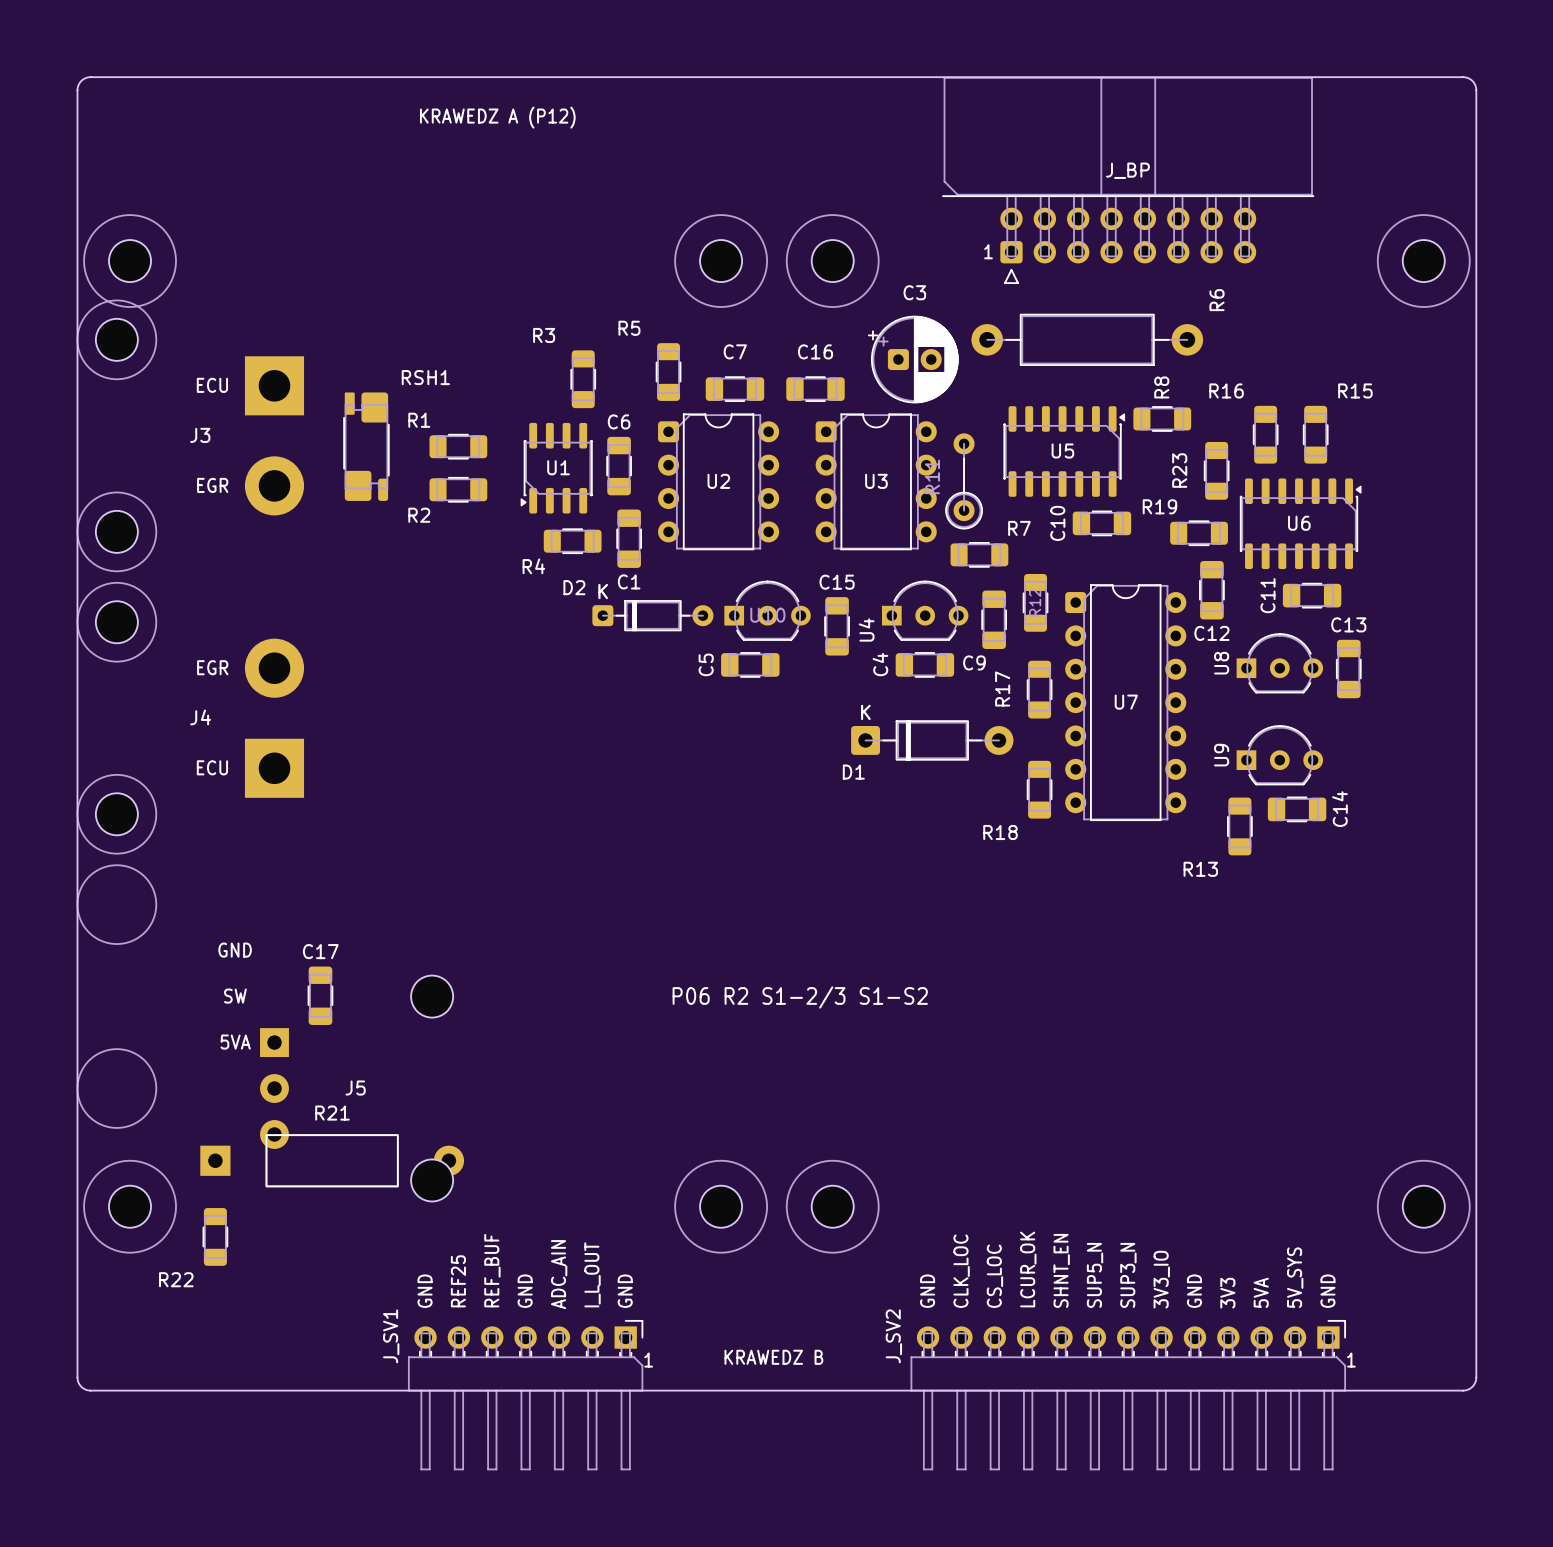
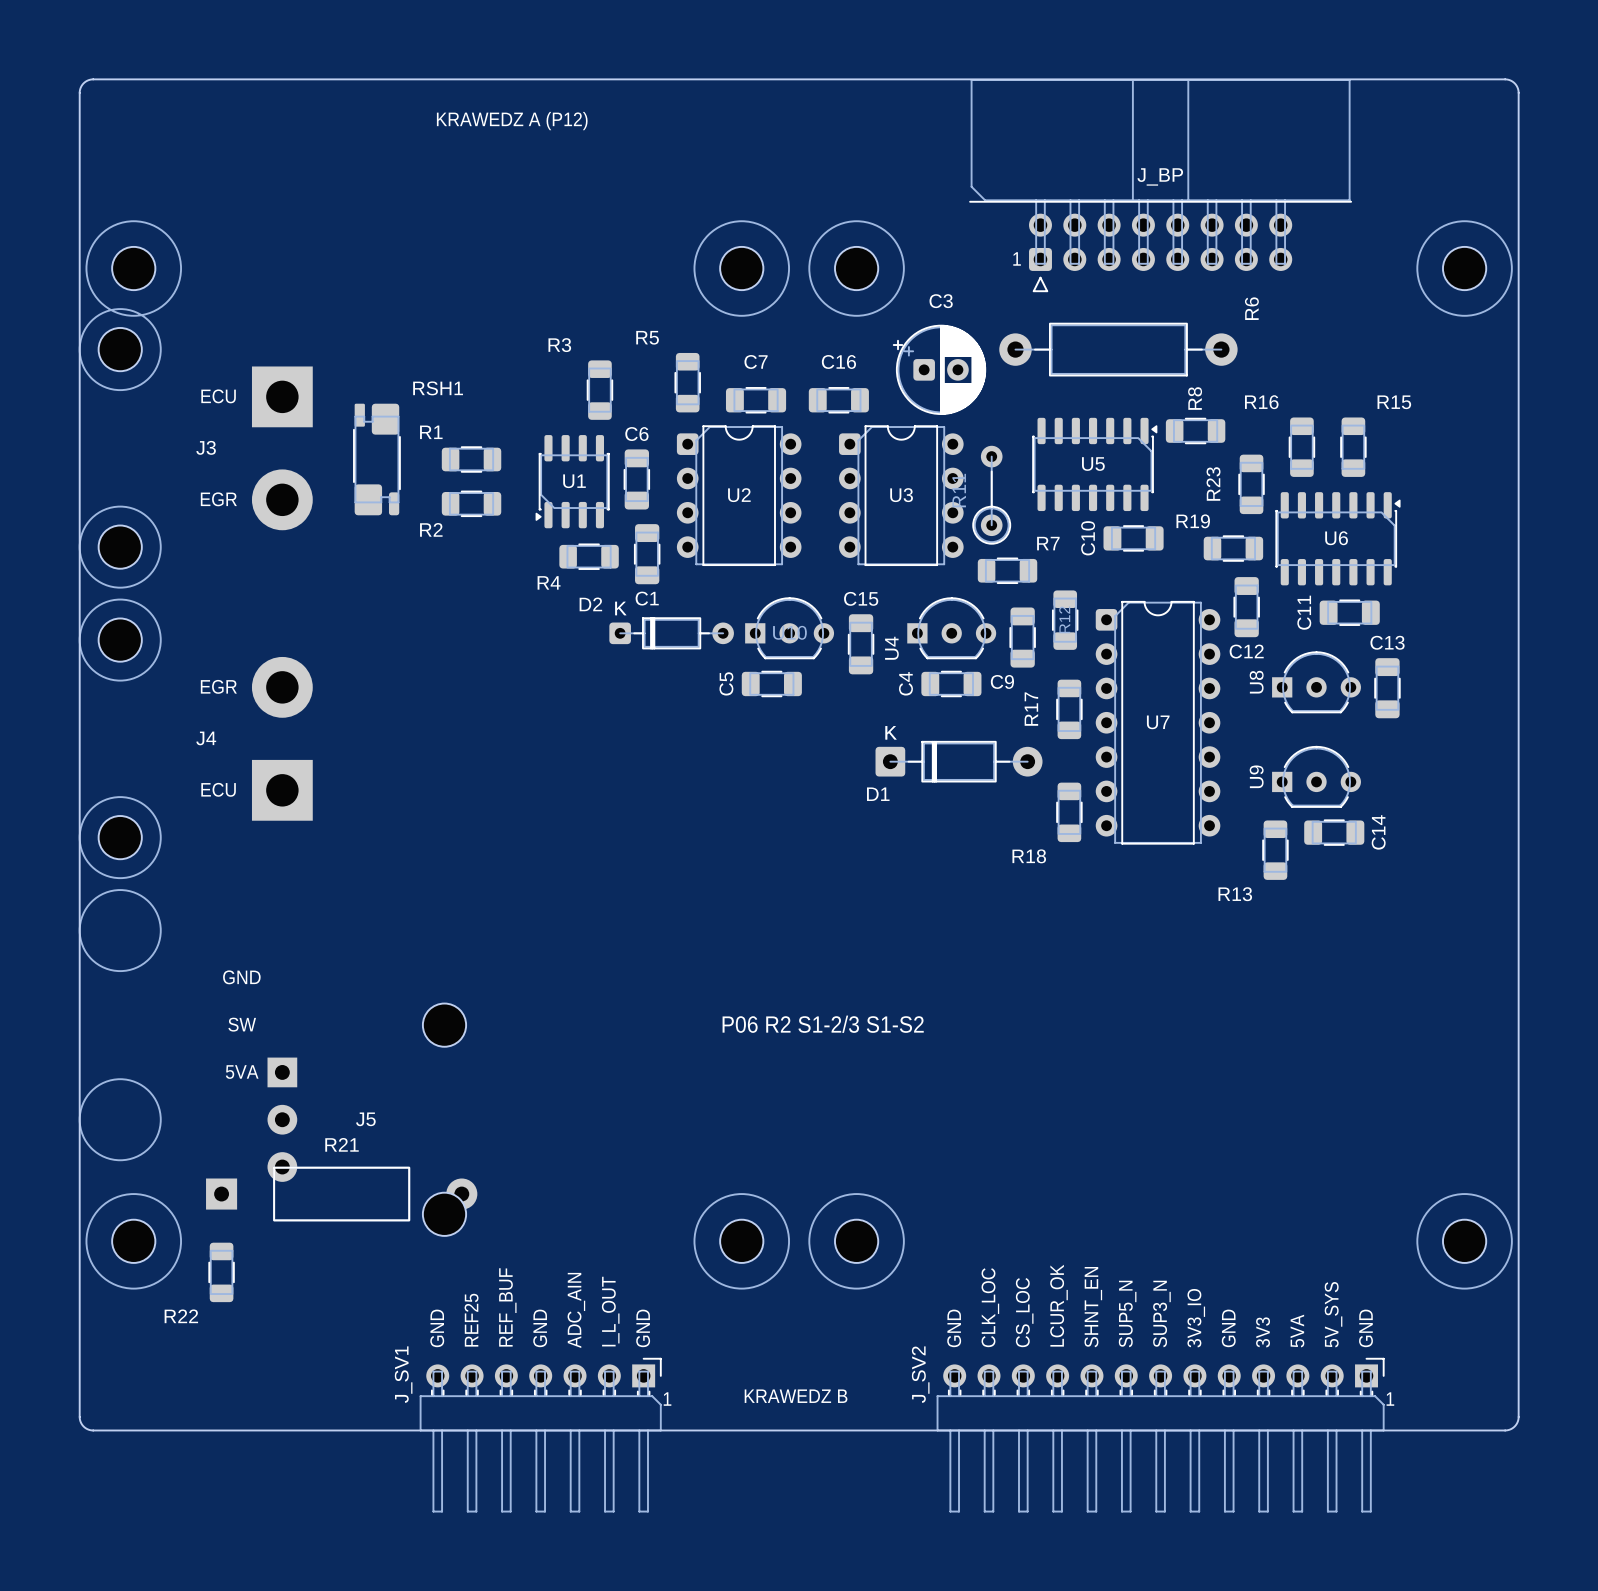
C17: (320, 995) -> none

